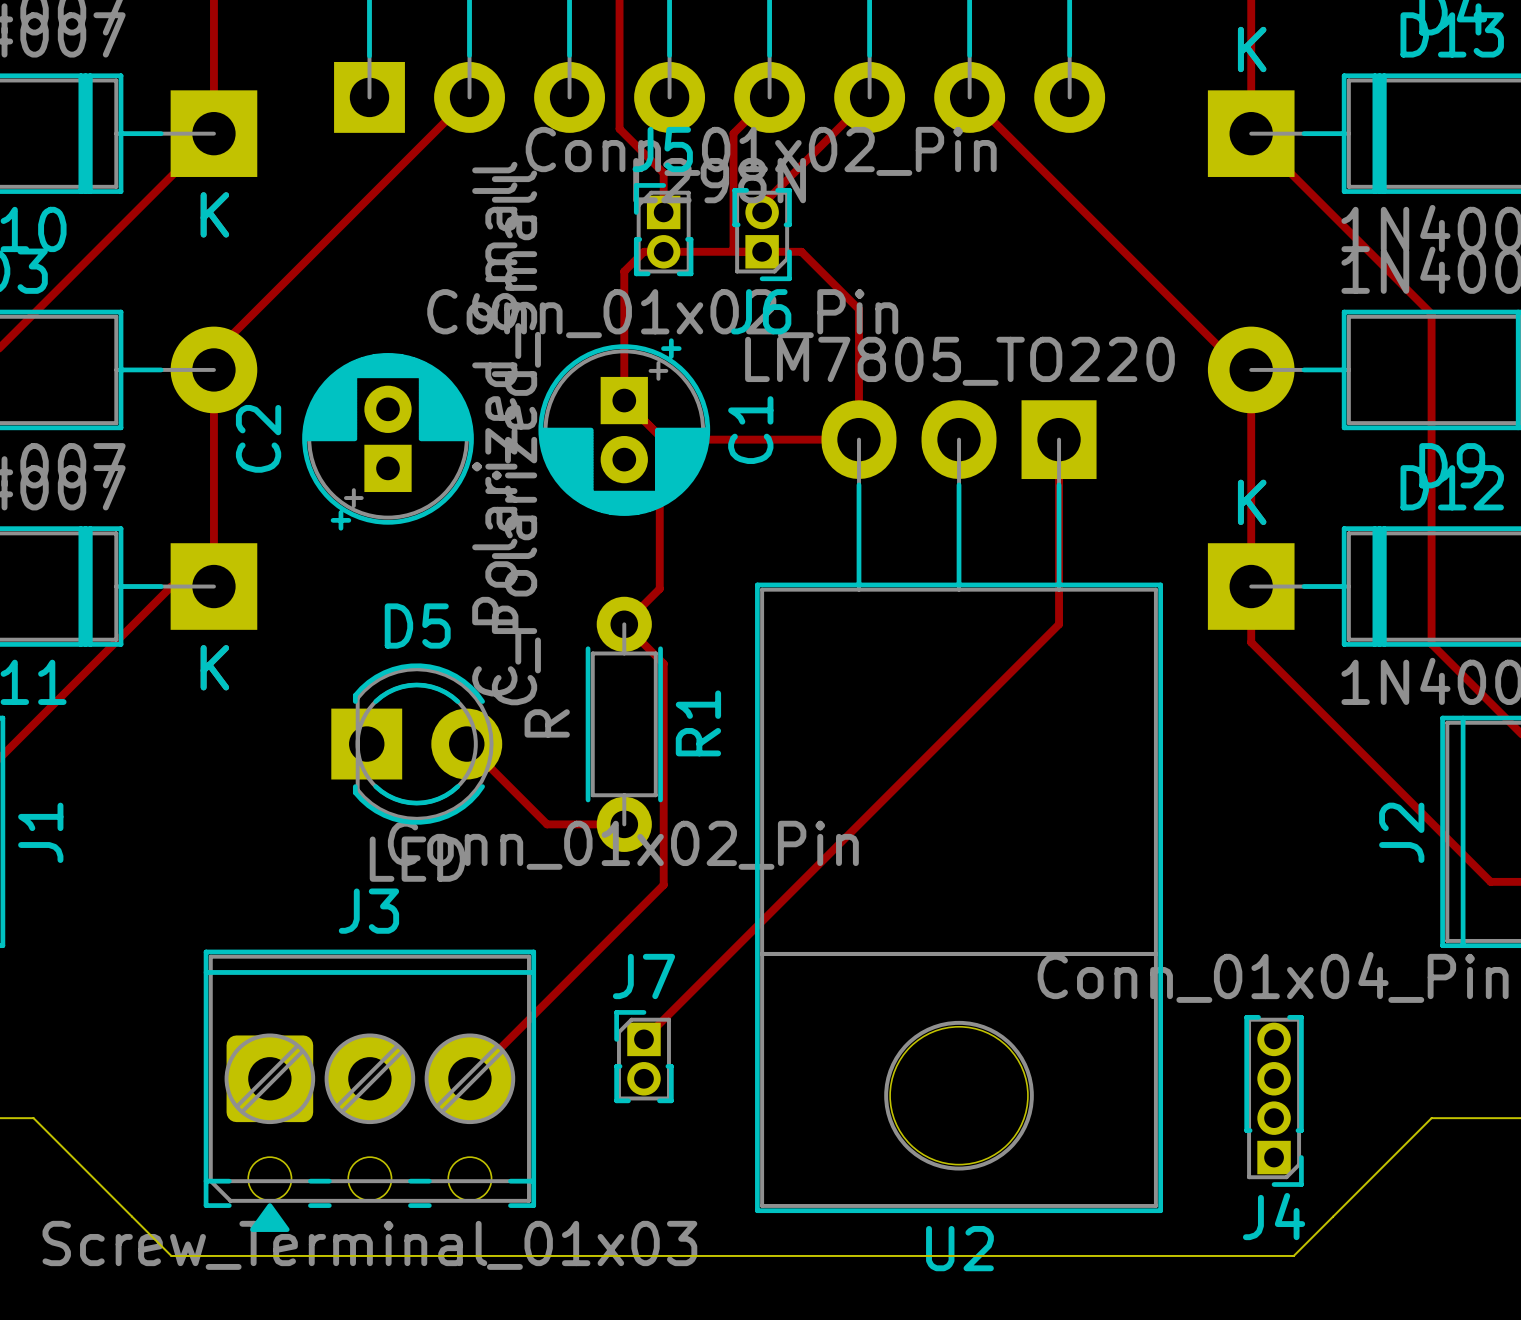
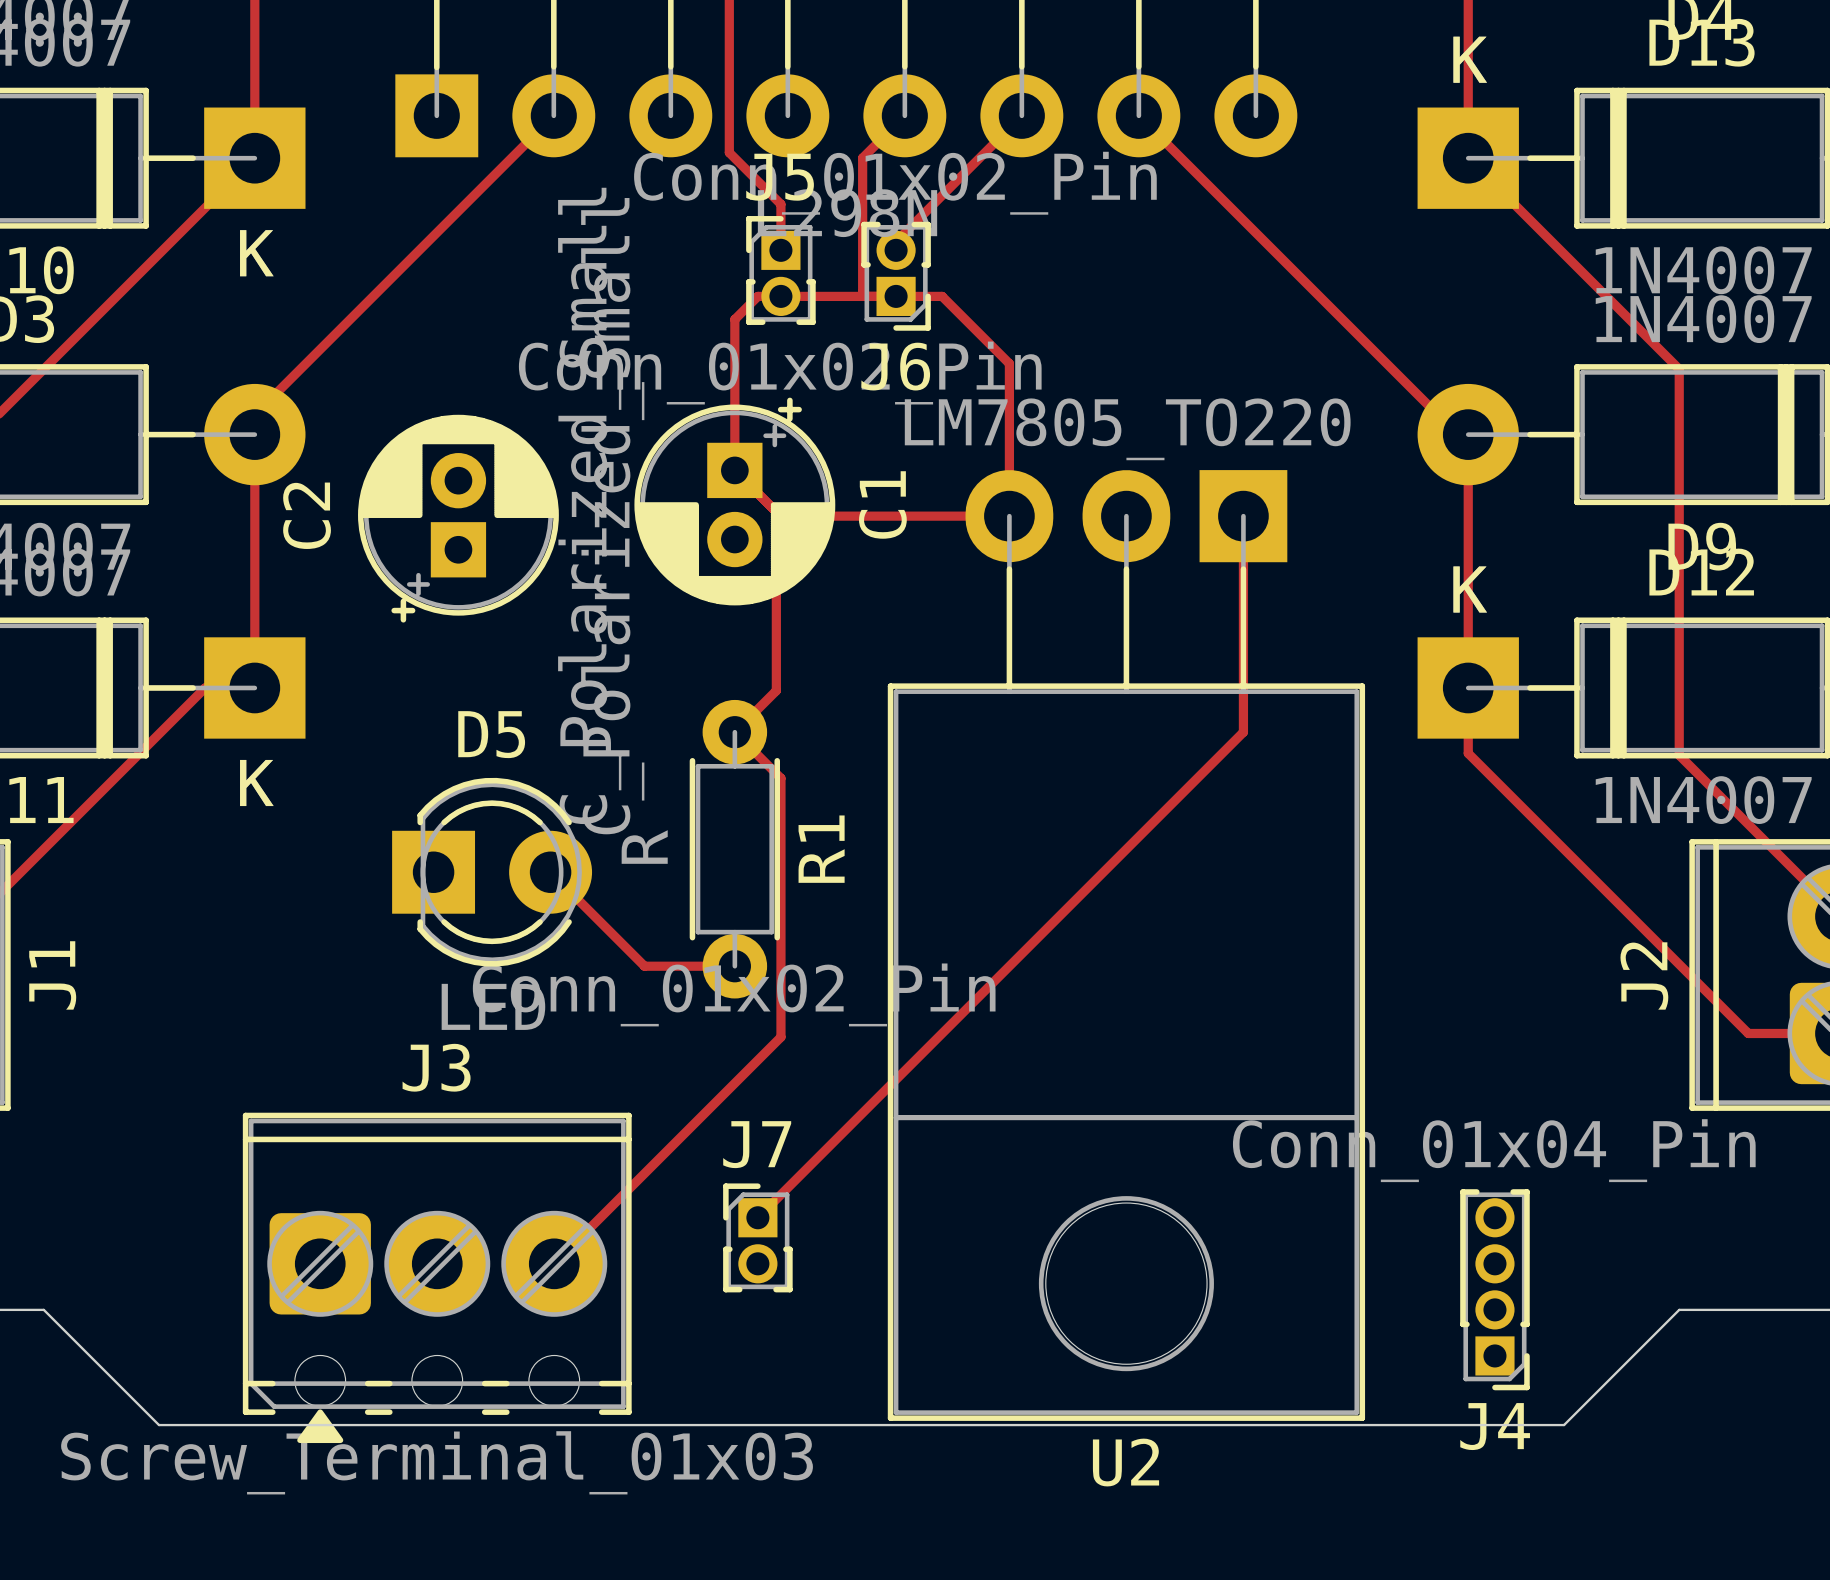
board edge: (132, 1216) (171, 1255) (1293, 1255) (1333, 1216) -> (159, 1425) (1564, 1425)

